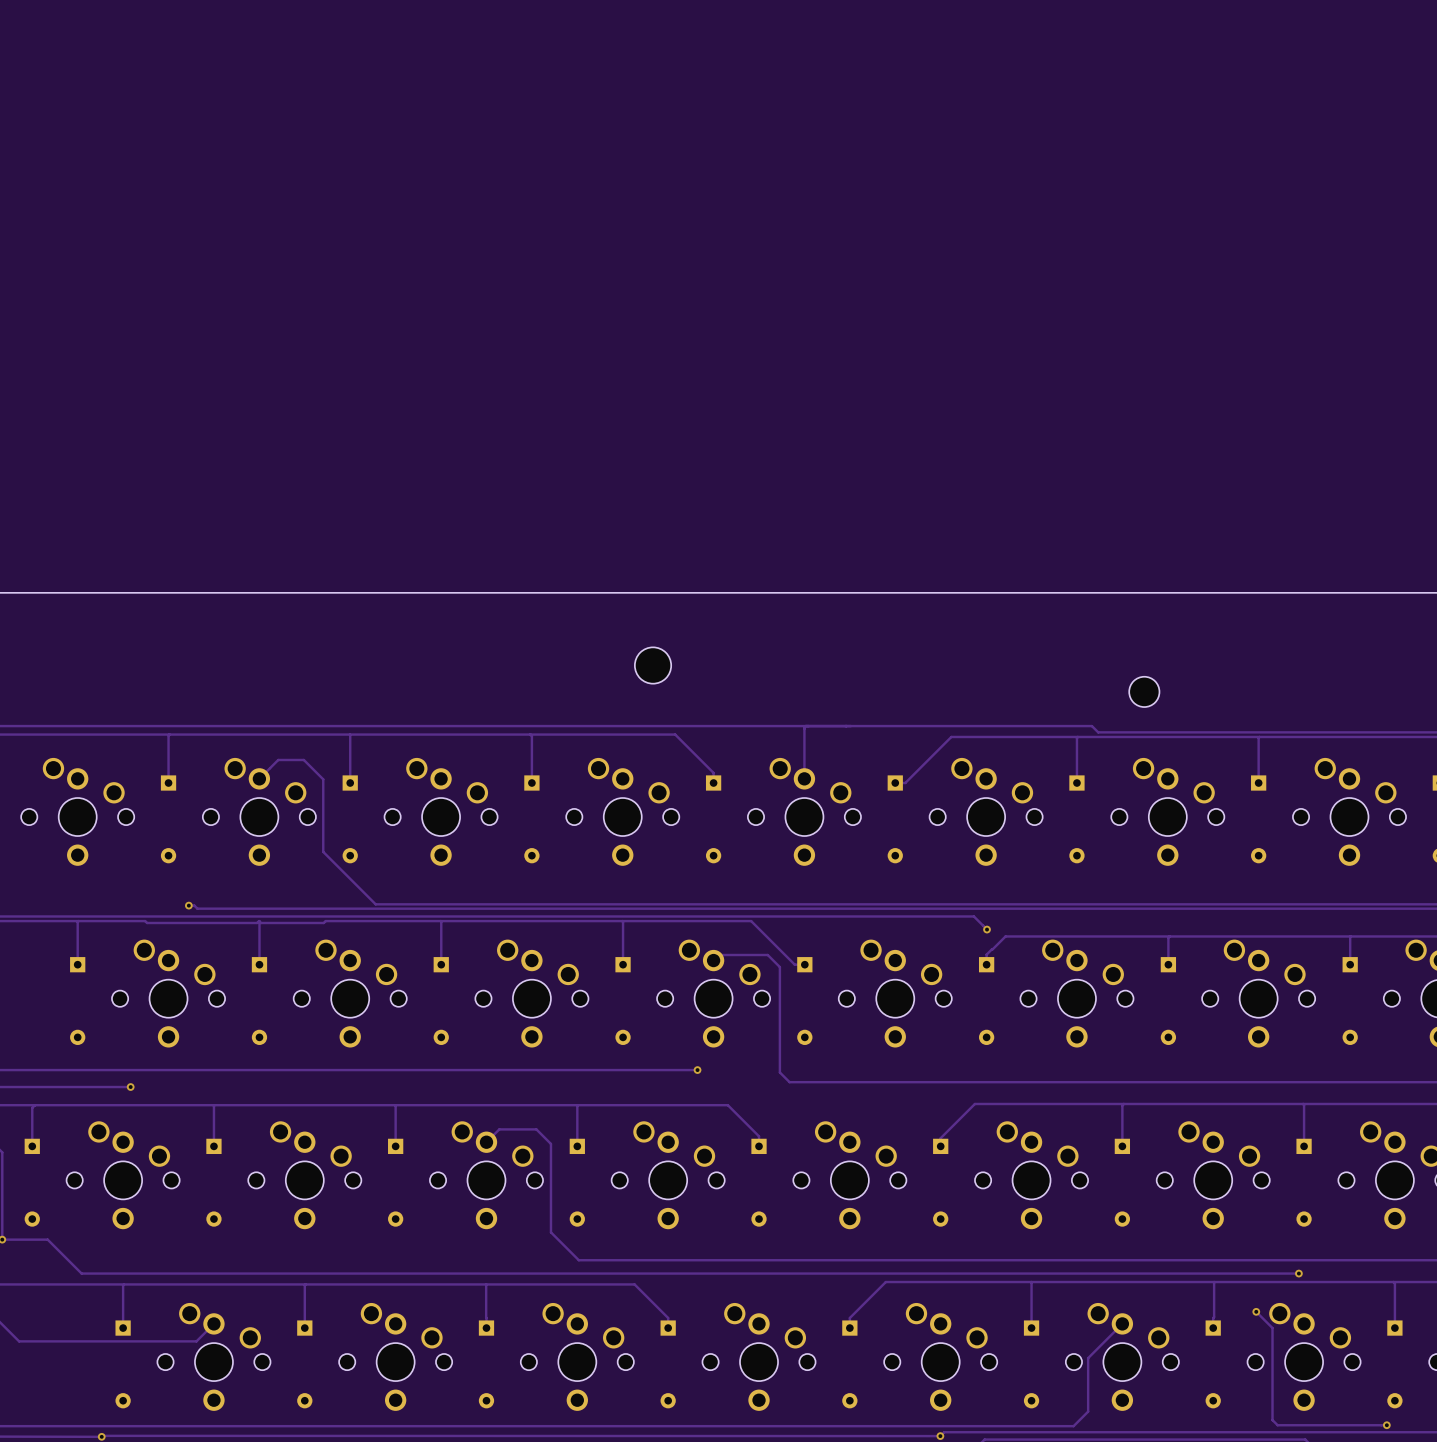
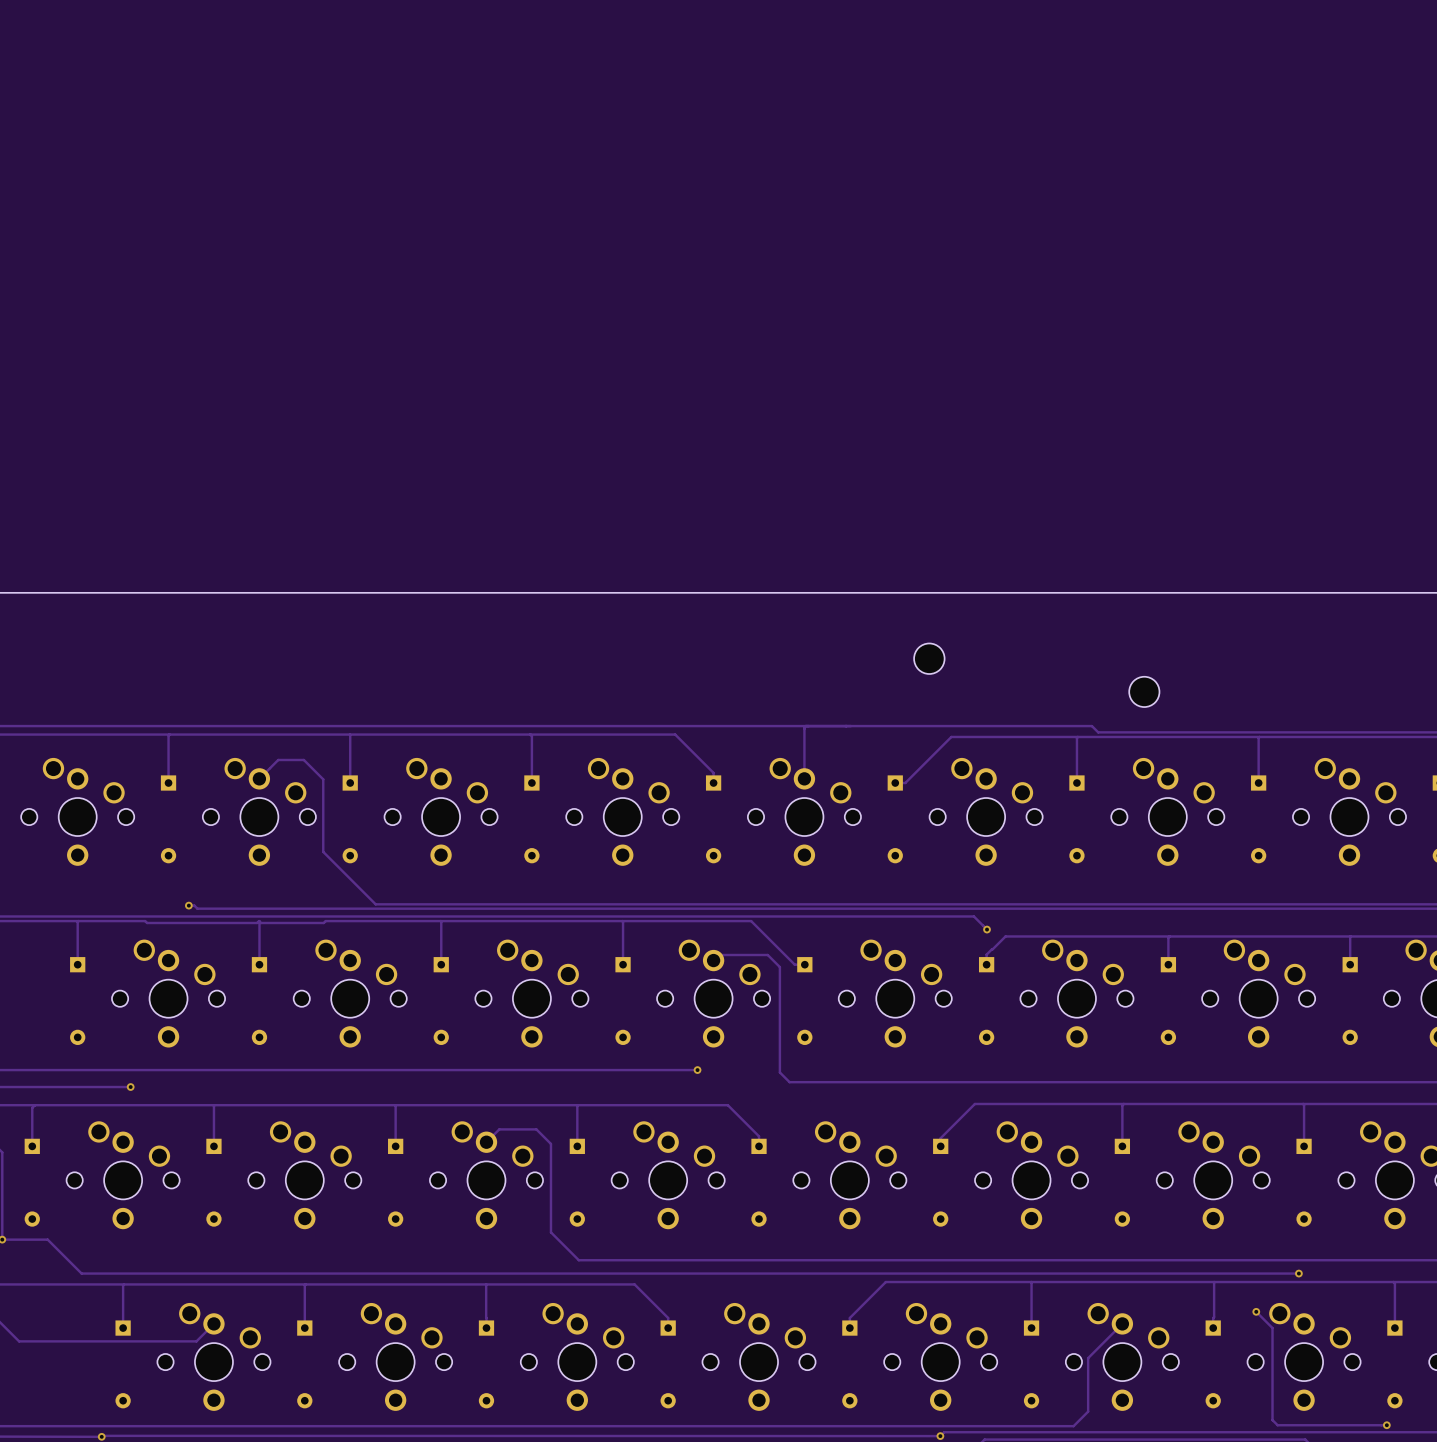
part: none -> (929, 658)
part: (653, 665) -> none

